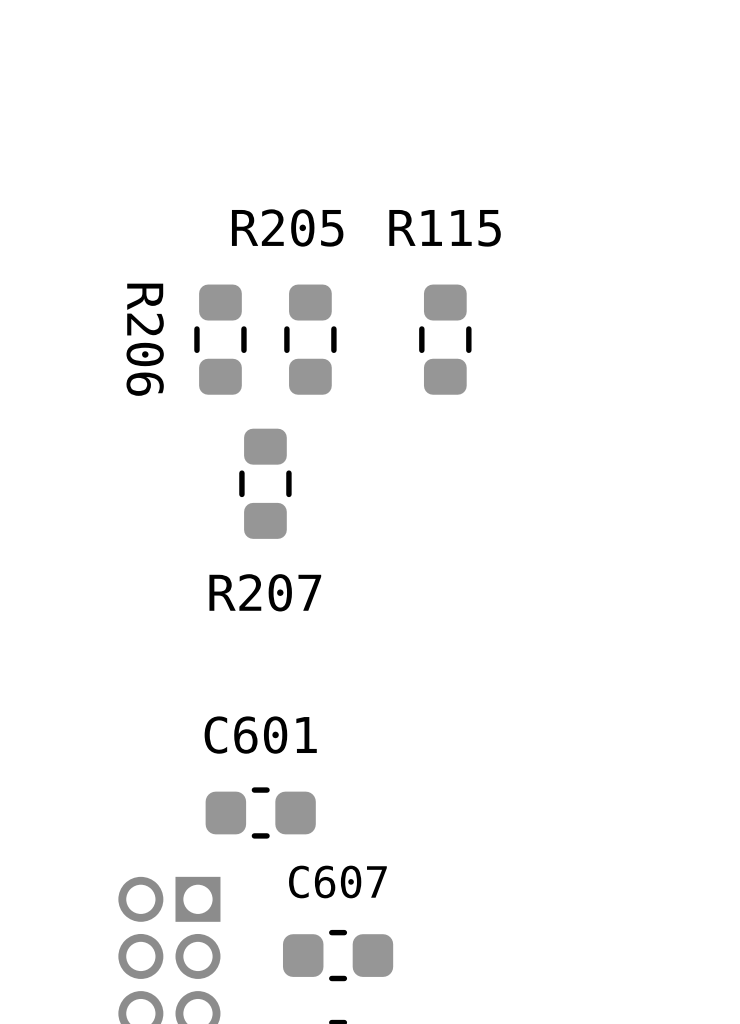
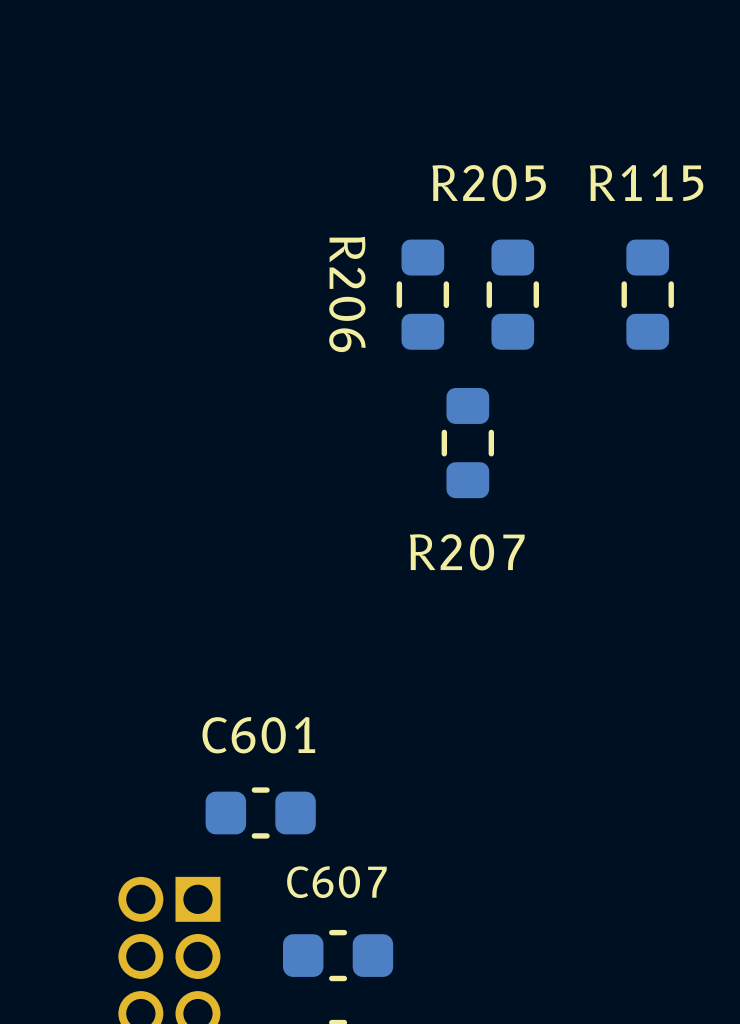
R206 position: (220, 339) -> (422, 294)
R205 position: (310, 339) -> (512, 294)
R115 position: (445, 339) -> (647, 294)
R207 position: (265, 483) -> (467, 443)

